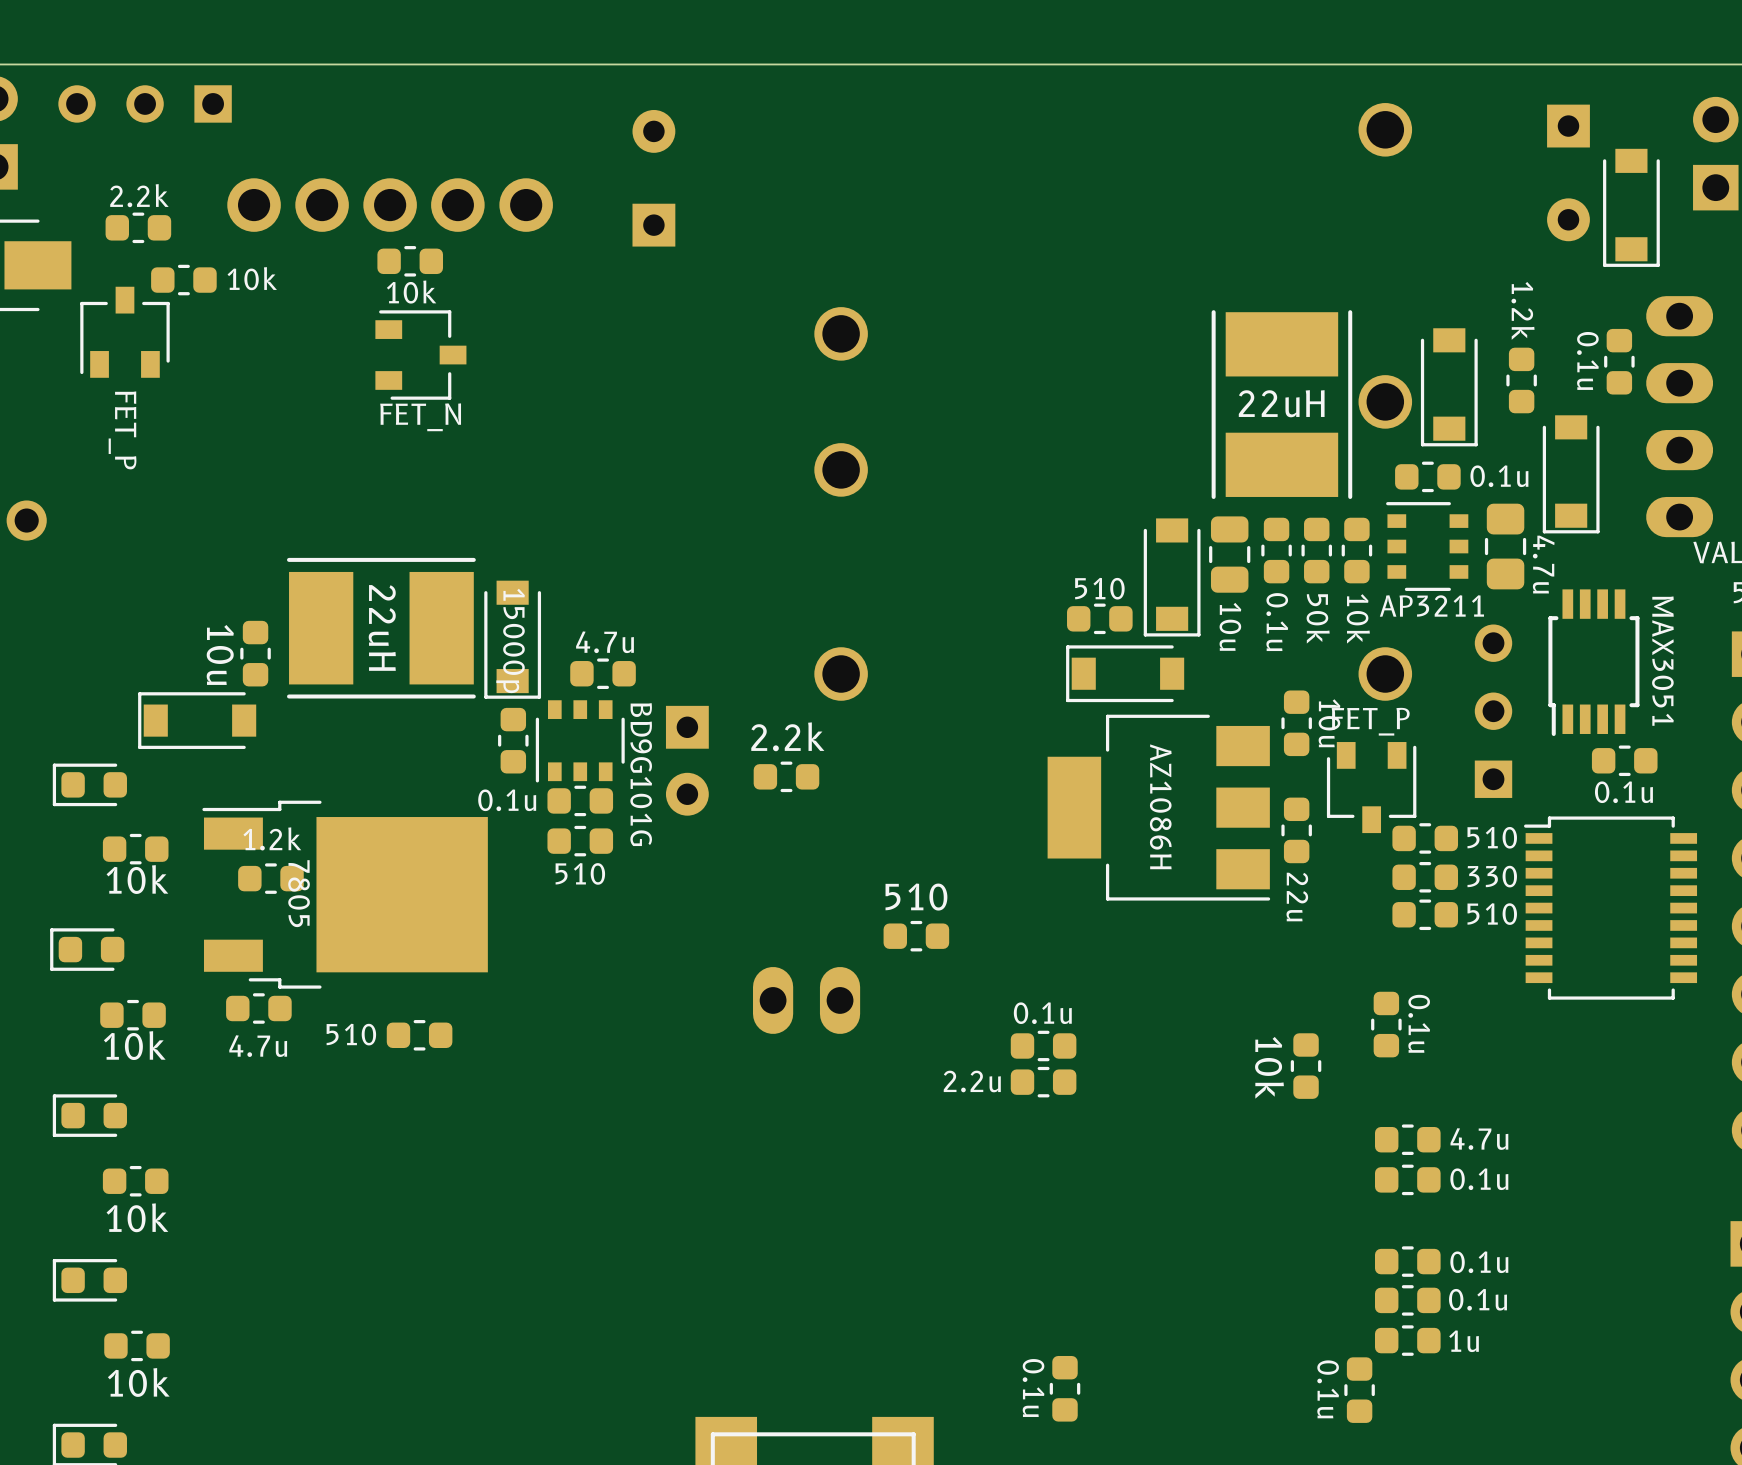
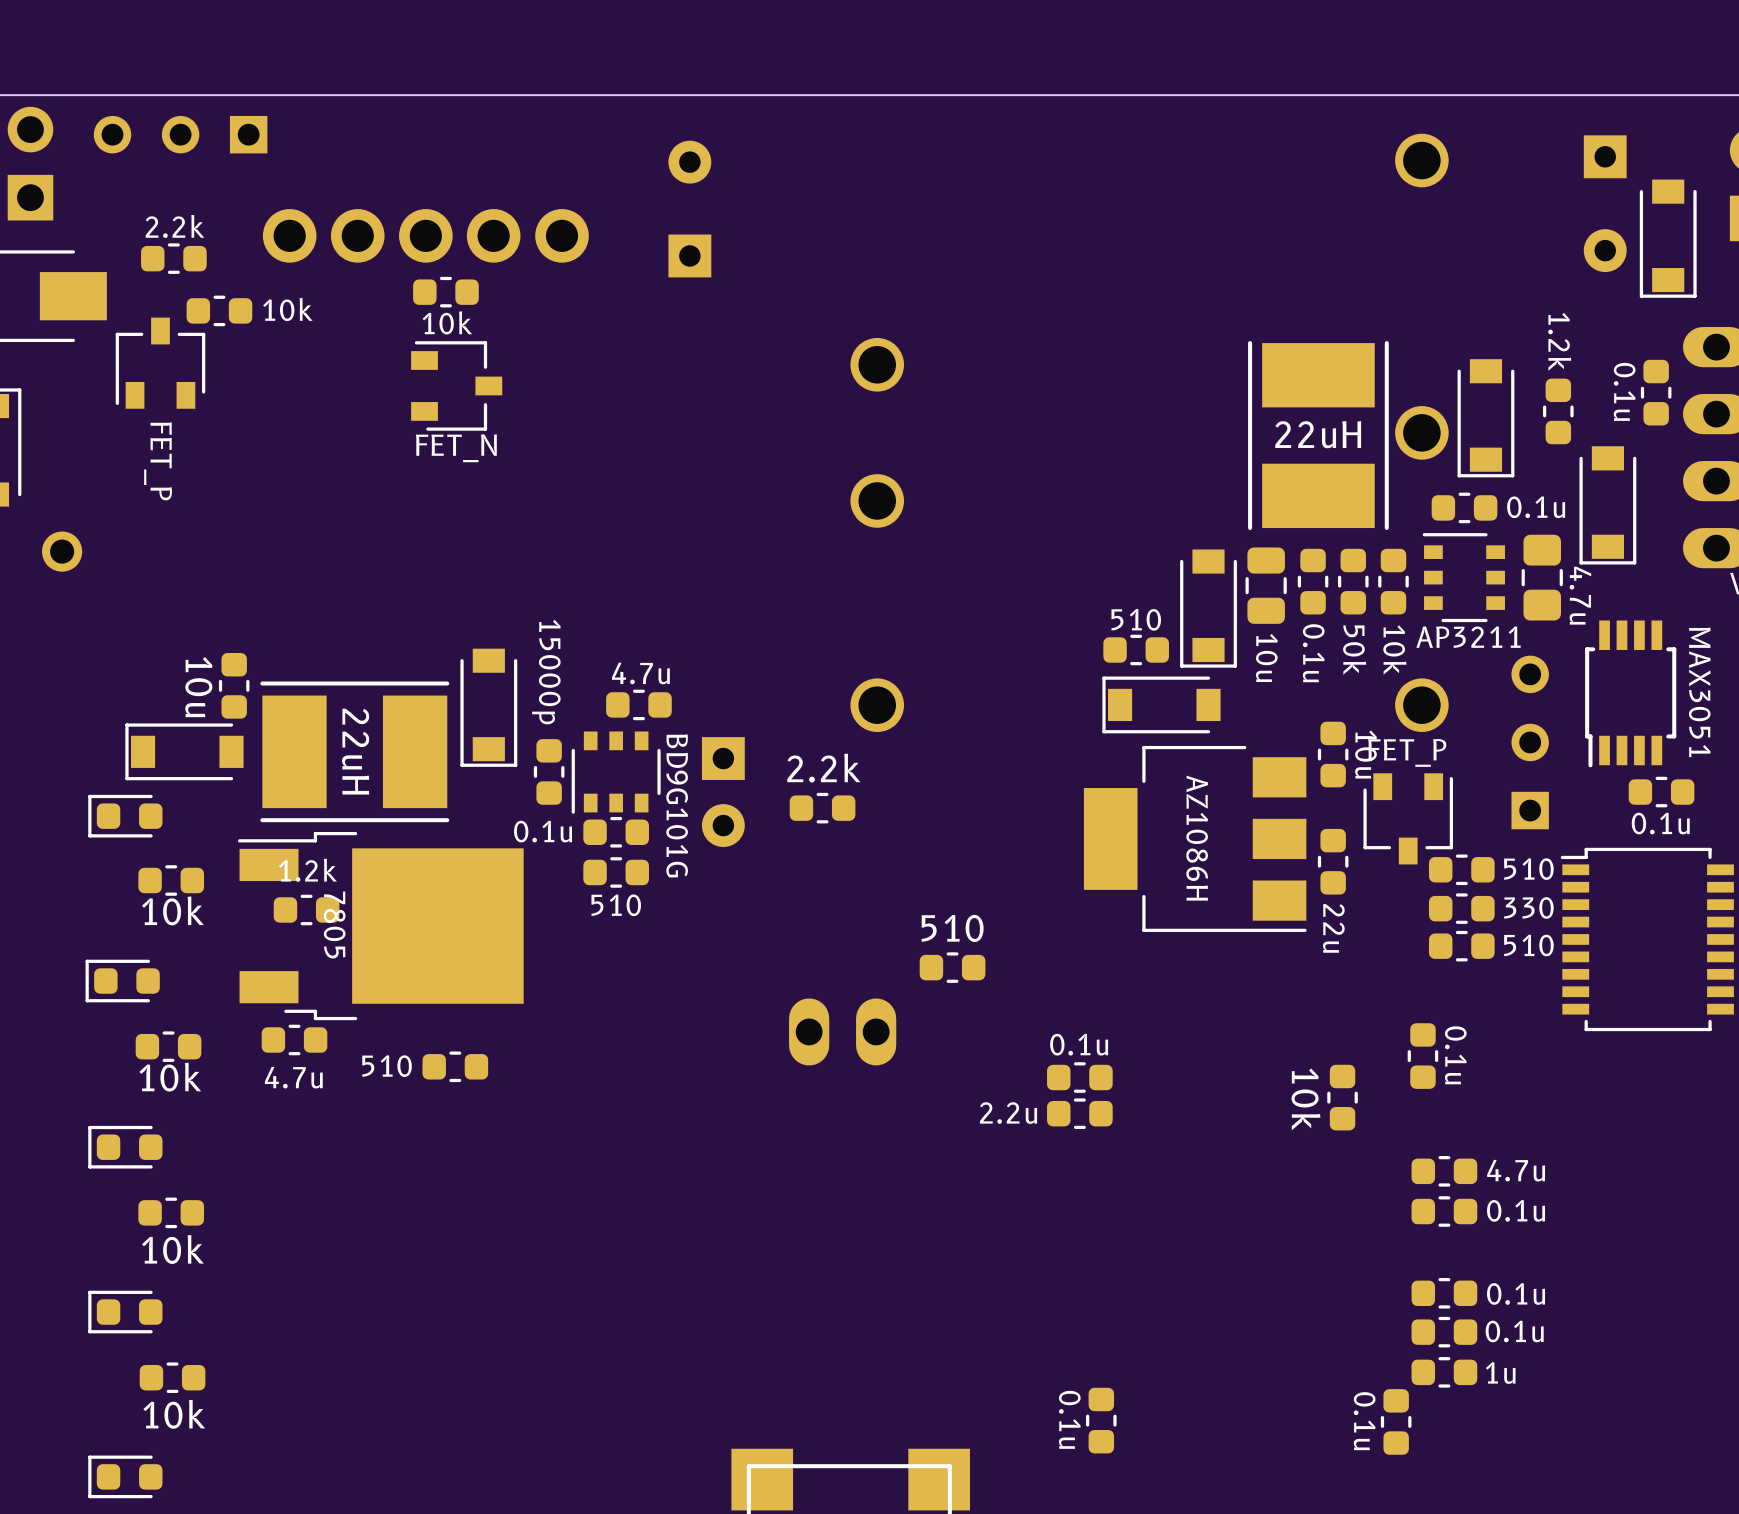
part position: (381, 628) -> (354, 751)
part position: (512, 639) -> (488, 707)
part position: (255, 653) -> (234, 685)
part position: (197, 720) -> (184, 751)

